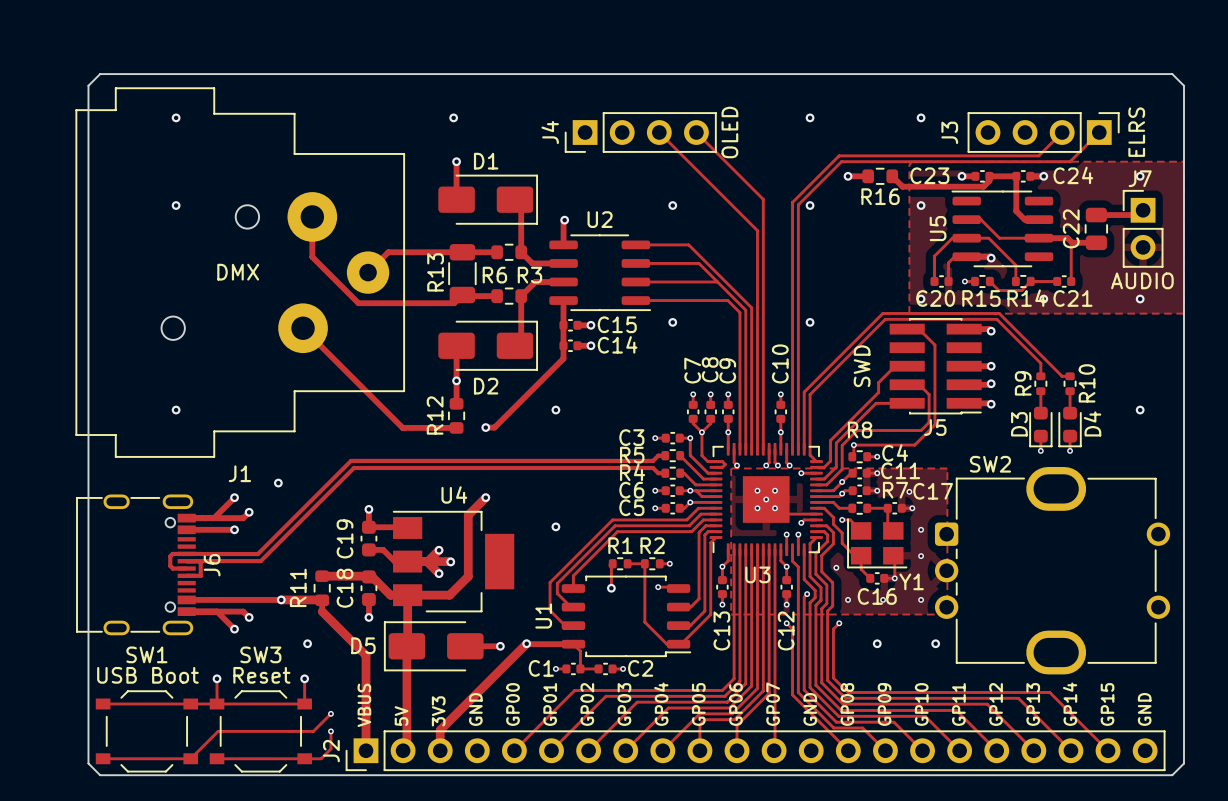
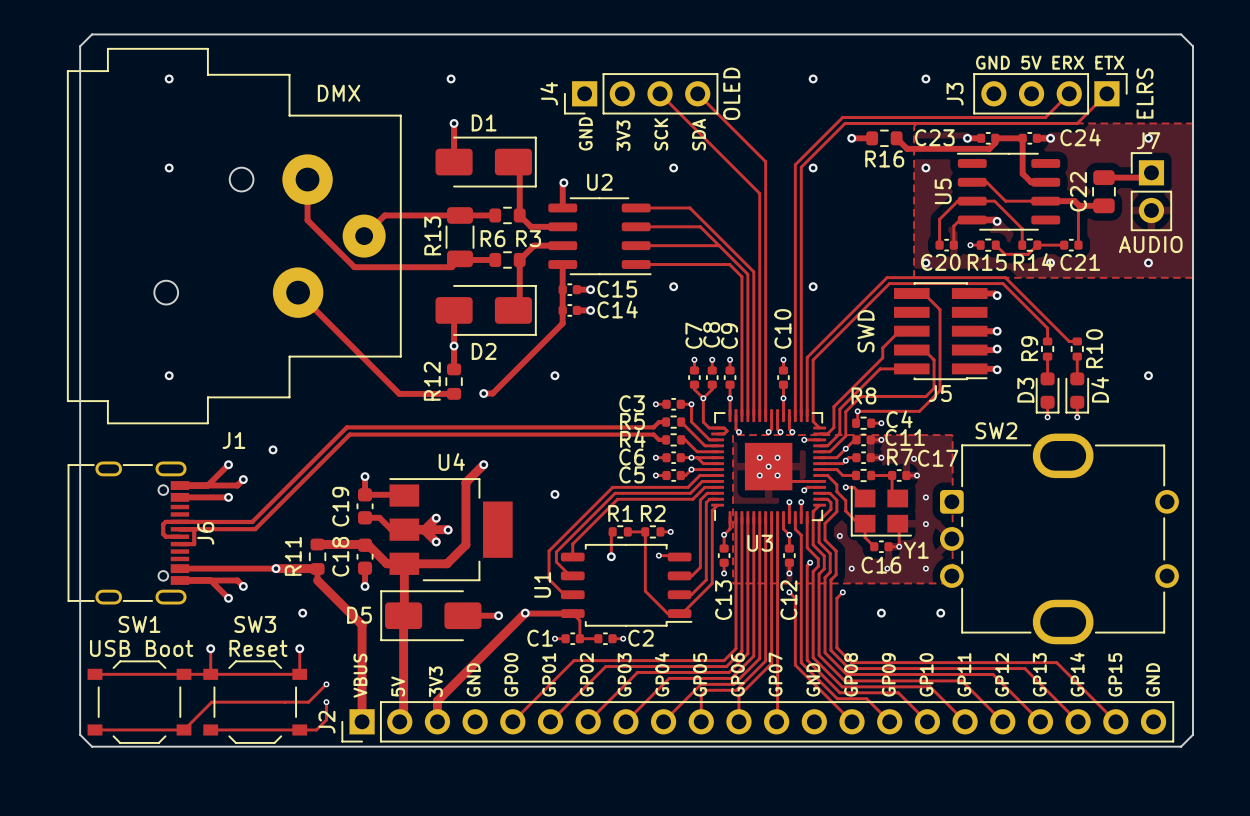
text: none -> GND 5V ERX ETX (1050, 62)
text: none -> GND (585, 133)
text: none -> SCK (661, 134)
text: none -> SDA (699, 134)
text: none -> 3V3 (623, 135)
J1 value position: DMX (238, 272) -> DMX (339, 93)
SW1 value: USB Boot (147, 675) -> none
SW3 value: Reset (261, 675) -> none
text: none -> USB Boot (141, 648)
text: none -> Reset (258, 648)

